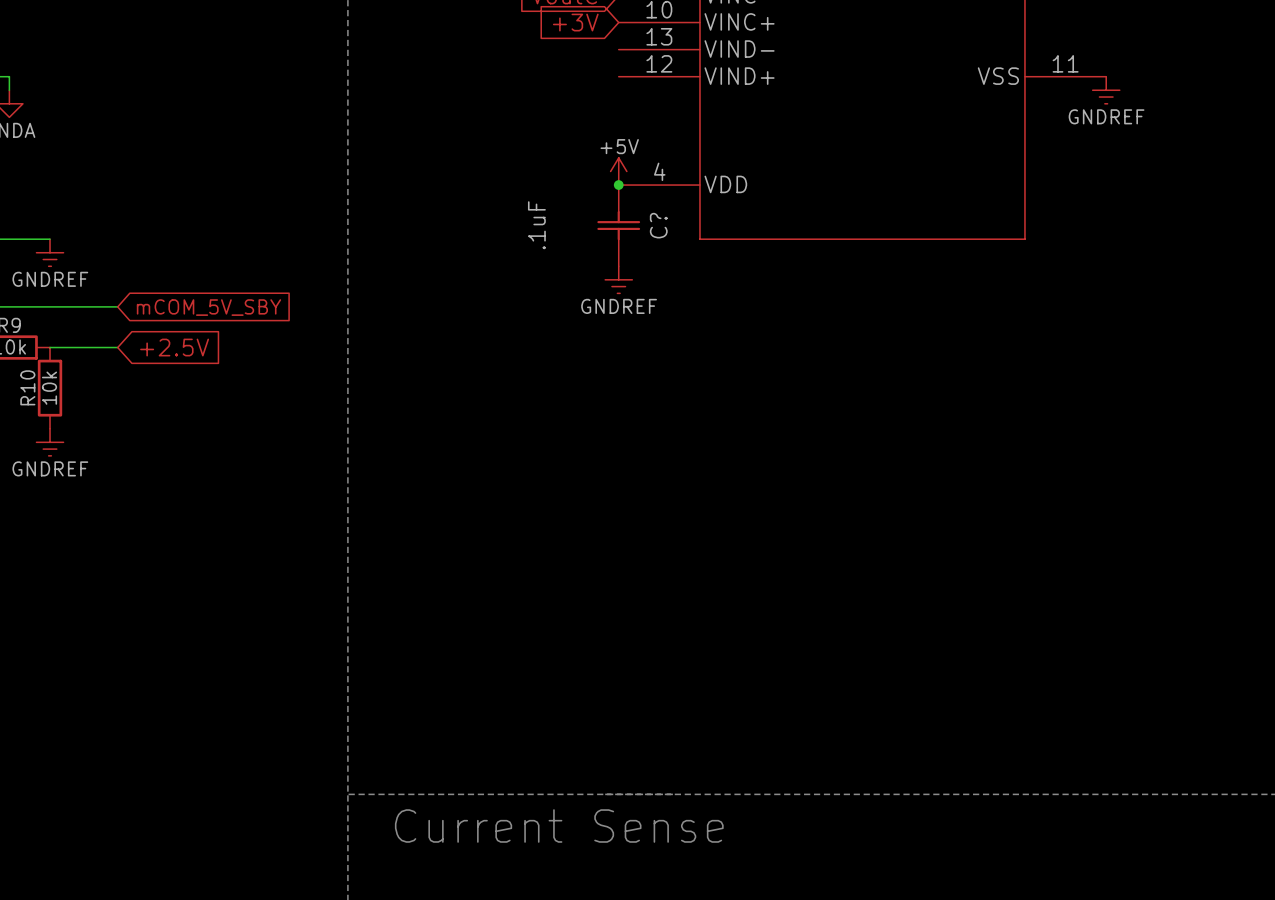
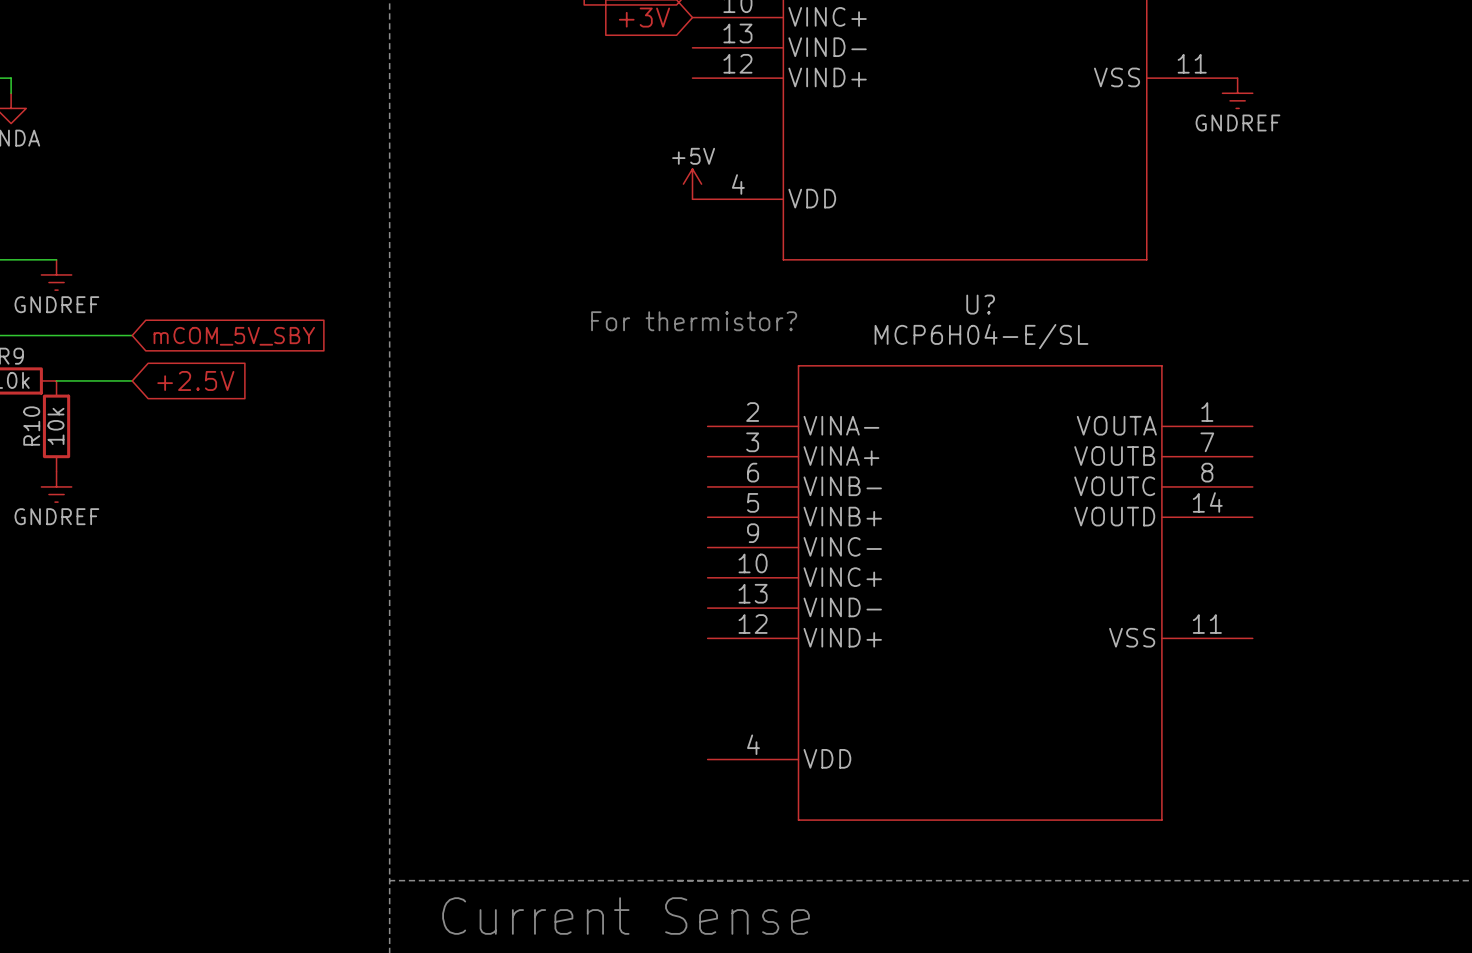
junction: (618, 185) -> none
C?: .1uF (618, 225) -> none
power symbol: GNDREF (618, 279) -> none
text: none -> For thermistor? (694, 321)
U?: none -> MCP6H04-E/SL (980, 592)

